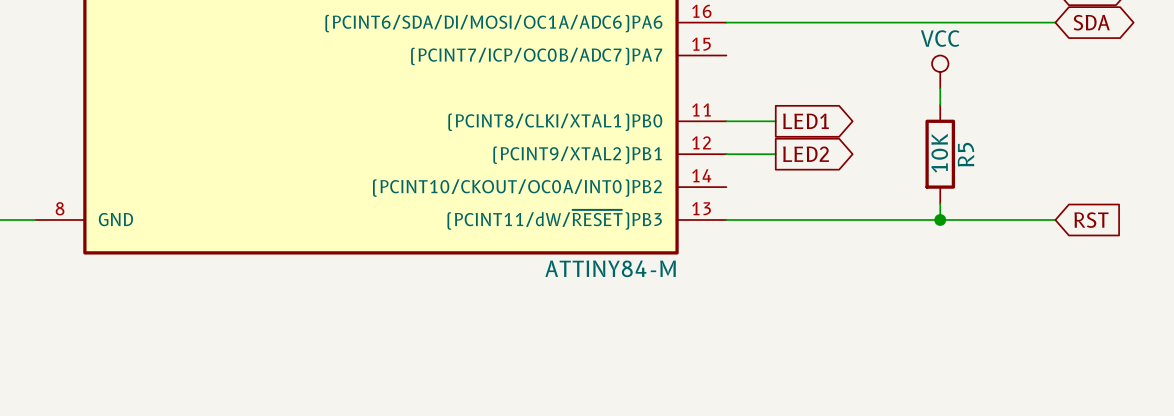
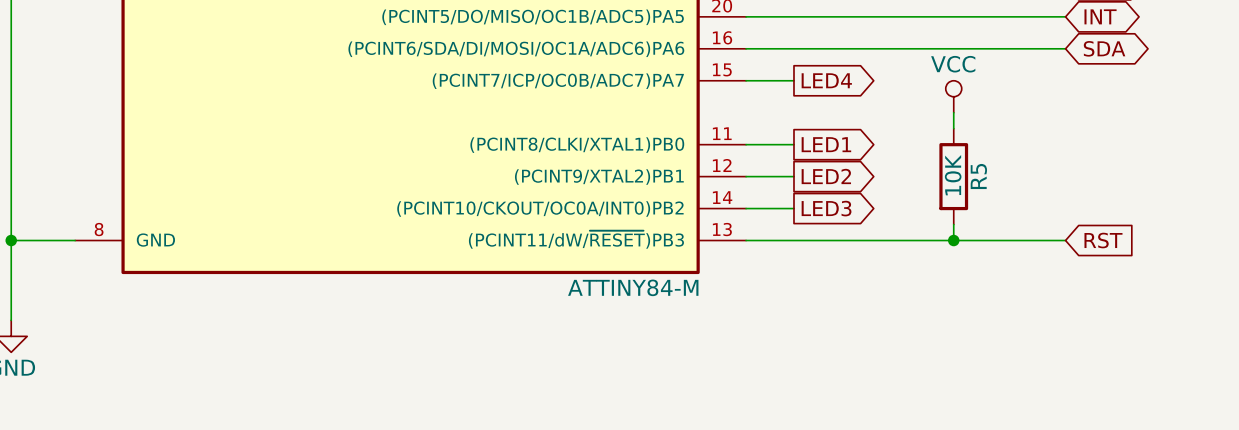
wire: none -> (746, 80) (793, 80)
global label: none -> LED4 (826, 80)
wire: none -> (746, 208) (793, 208)
global label: none -> LED3 (826, 208)

